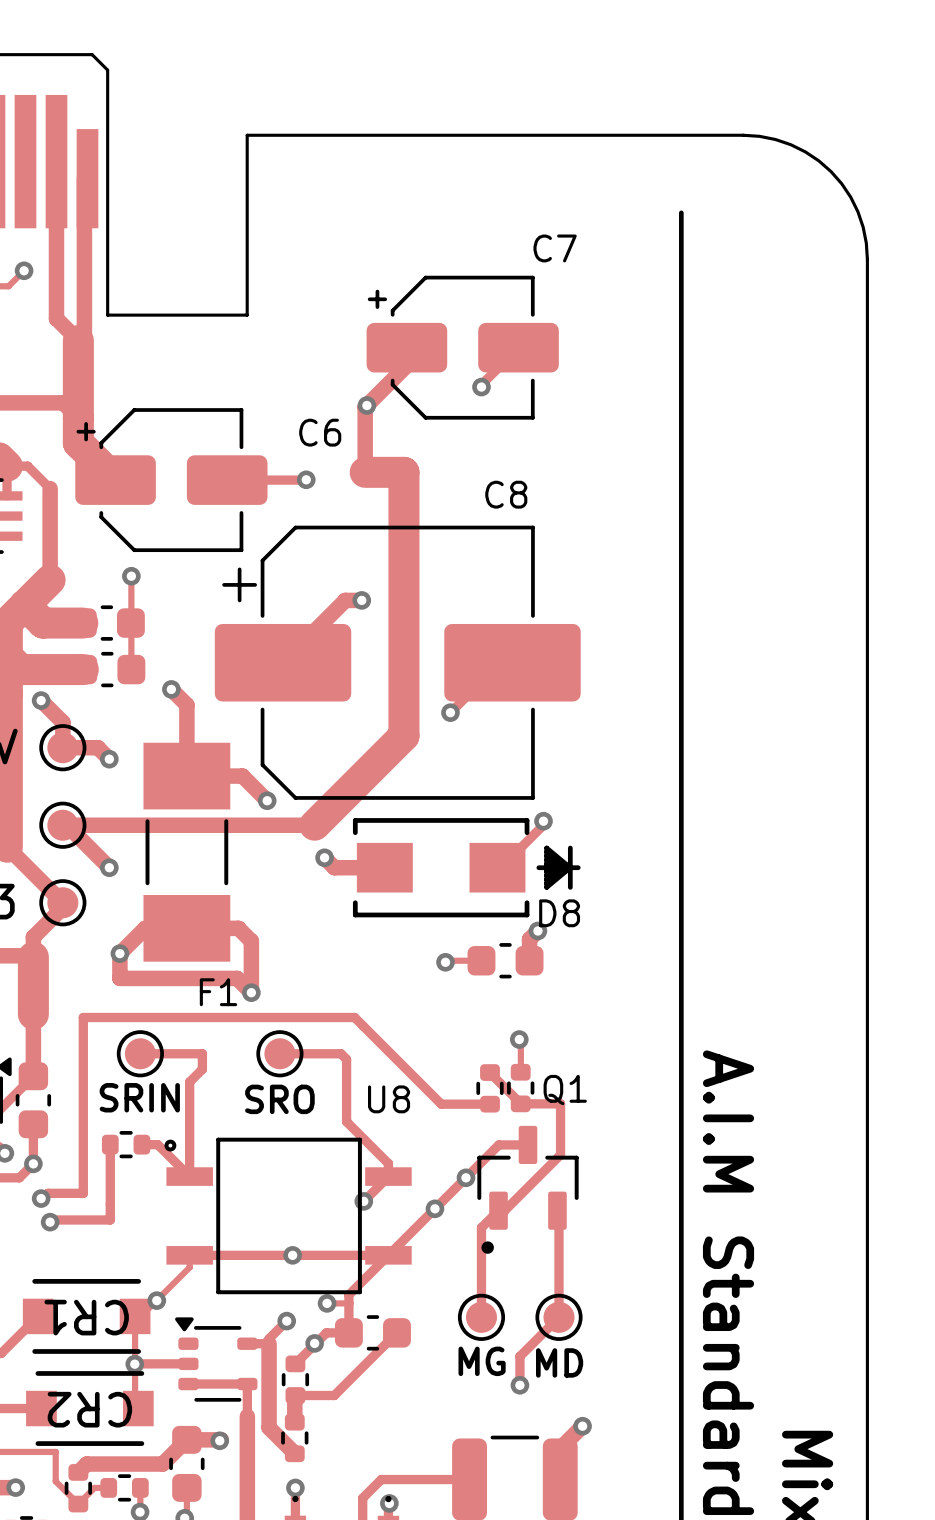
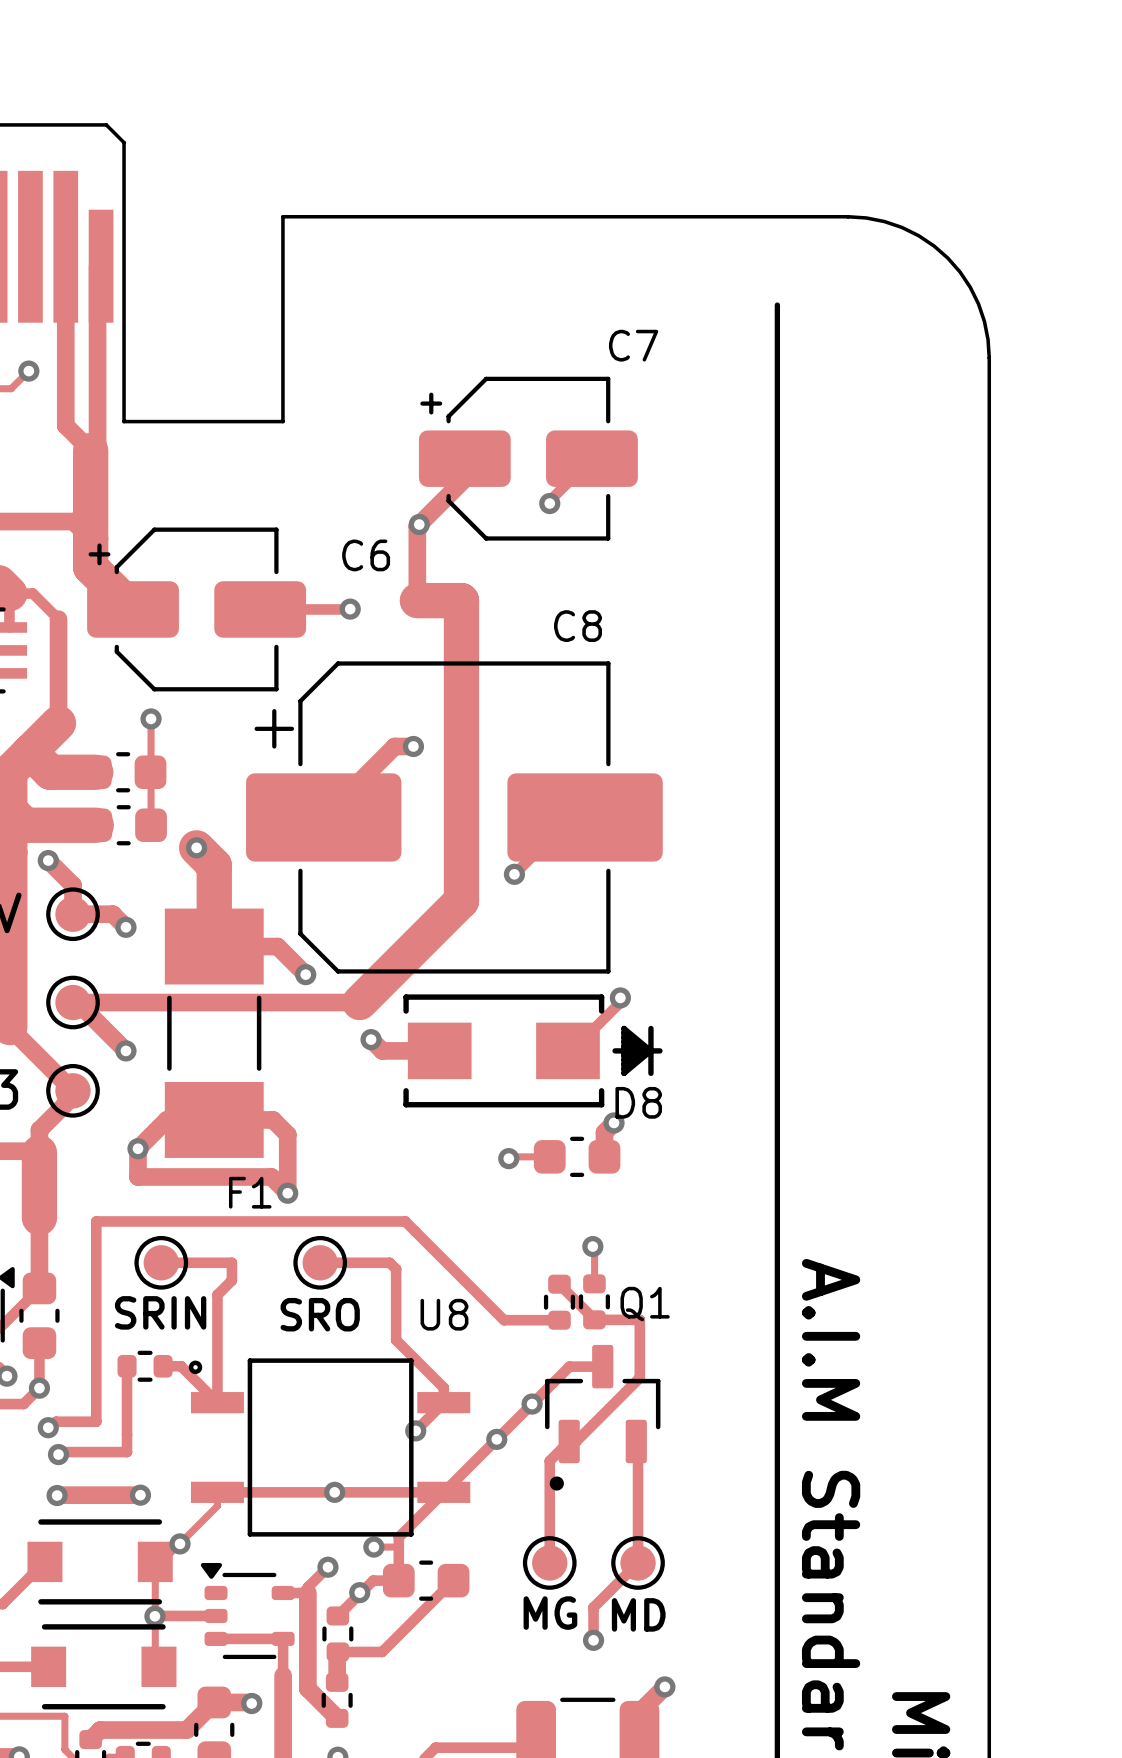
track width: thin (171, 689) (186, 704) (186, 776) -> thick (196, 847) (214, 865) (214, 946)
track: none -> (57, 1495) (140, 1495)
via: none -> (140, 1495)
via: none -> (57, 1495)
CR1 name: CR1 (86, 1317) -> none
CR2 name: CR2 (89, 1409) -> none

